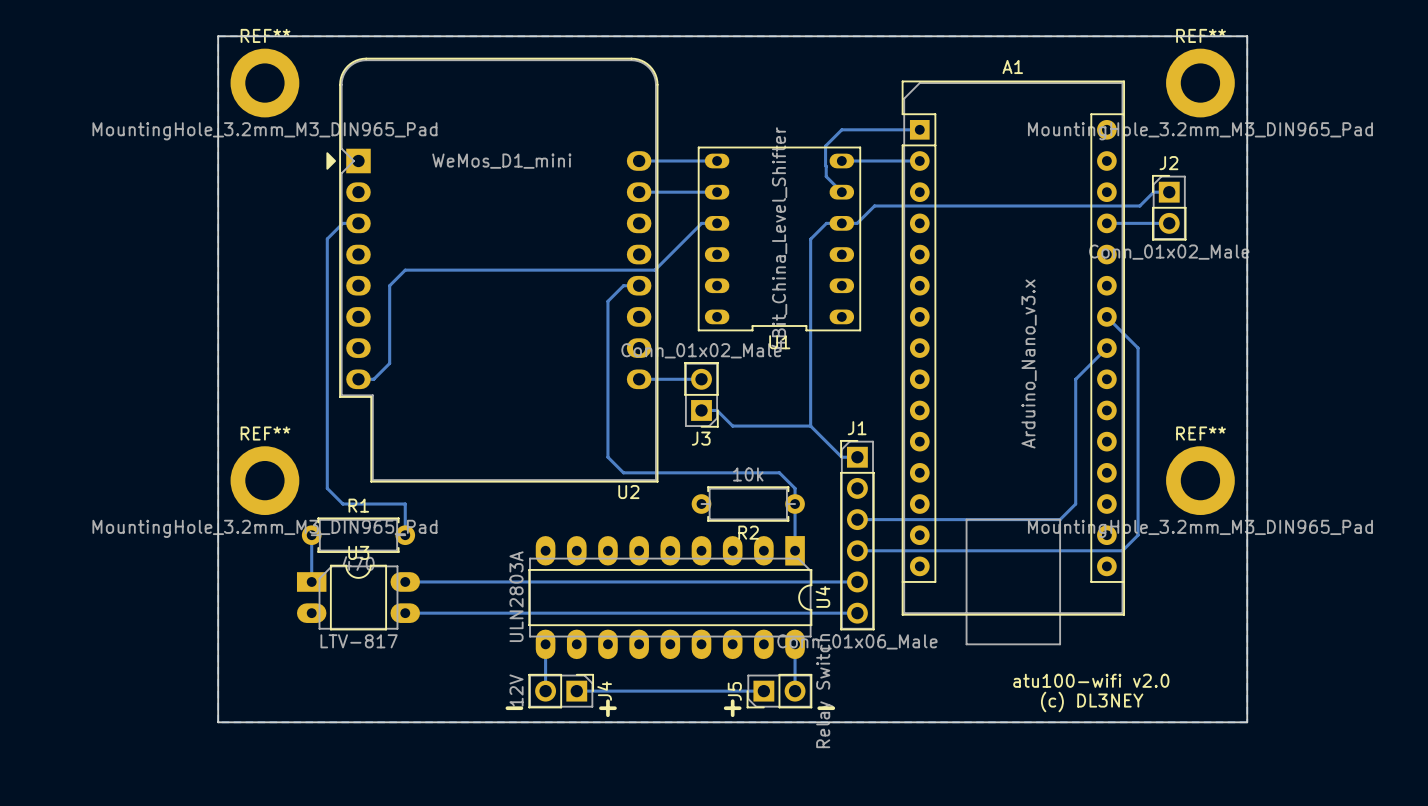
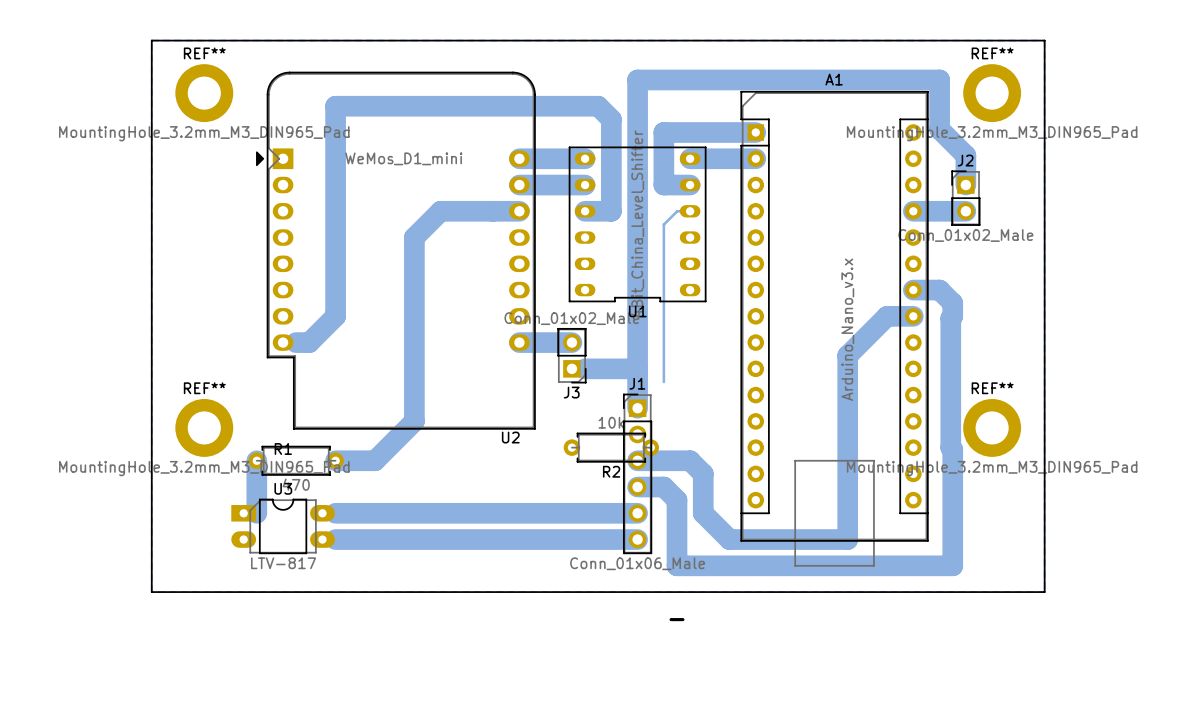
board edge: (218, 36) (218, 722) (1247, 722) (1247, 36) (218, 36) -> (151, 40) (151, 592) (1044, 592) (1044, 40) (151, 40)
bottom track: (841, 129) (825, 146) (826, 176) (841, 192) -> (690, 132) (663, 132) (663, 185) (690, 185)
bottom track width: thin (841, 129) (919, 129) -> thick (690, 132) (755, 132)
bottom track width: thin (639, 161) (717, 161) -> thick (519, 158) (585, 158)
bottom track width: thin (841, 161) (919, 161) -> thick (690, 158) (755, 158)
bottom track width: thin (639, 192) (717, 192) -> thick (519, 185) (585, 185)
bottom track: (1169, 192) (1153, 192) (1139, 205) (874, 205) (857, 223) (841, 223) -> (965, 185) (965, 155) (939, 129) (939, 79) (637, 79) (637, 408)
bottom track: (358, 223) (342, 223) (327, 238) (327, 488) (342, 504) (405, 504) (405, 535) -> none
bottom track: none -> (519, 211) (440, 211) (414, 237) (414, 421) (374, 460) (335, 460)
bottom track: (717, 223) (701, 223) (654, 270) (405, 270) (389, 285) (389, 363) (373, 379) -> (585, 211) (611, 211) (611, 119) (598, 106) (335, 106) (335, 316) (309, 342) (296, 342)
bottom track width: thin (1106, 223) (1169, 223) -> thick (913, 211) (965, 211)
bottom track: (639, 285) (623, 285) (607, 301) (607, 457) (623, 472) (779, 472) (795, 488) (795, 550) -> none
bottom track: (1106, 316) (1138, 348) (1138, 535) (1122, 550) (857, 550) -> (913, 290) (939, 290) (952, 303) (952, 316) (950, 318) (952, 565) (676, 565) (676, 500) (663, 487) (637, 487)
bottom track: (1106, 348) (1075, 379) (1075, 504) (1060, 519) (857, 519) -> (913, 316) (887, 316) (847, 355) (847, 539) (729, 539) (703, 513) (703, 473) (690, 460) (637, 460)
bottom track width: thin (639, 379) (701, 379) -> thick (519, 342) (571, 342)
bottom track: (717, 410) (732, 426) (810, 426) (841, 457) (857, 457) -> (585, 368) (637, 368)
bottom track: none -> (256, 460) (256, 513)
bottom track: (311, 535) (311, 581) -> none
R1 position: (358, 535) -> (296, 460)
J1 position: (857, 535) -> (637, 473)
bottom track width: thin (420, 581) (779, 581) -> thick (335, 513) (637, 513)
bottom track: (779, 581) (857, 581) -> none
U4: ULN2803A (670, 597) -> none
bottom track width: thin (420, 613) (779, 613) -> thick (335, 539) (637, 539)
bottom track: (779, 613) (857, 613) -> none
bottom track: (545, 644) (545, 691) -> none
bottom track: (795, 644) (795, 691) -> none
text: atu100-wifi v2.0 (1091, 680) -> none
J4: 12V (561, 691) -> none
bottom track: (576, 691) (763, 691) -> none
J5: Relay Switch (779, 691) -> none
text: (c) DL3NEY (1092, 702) -> none
text: - (514, 708) -> none
text: + (607, 708) -> none
text: + (732, 708) -> none

